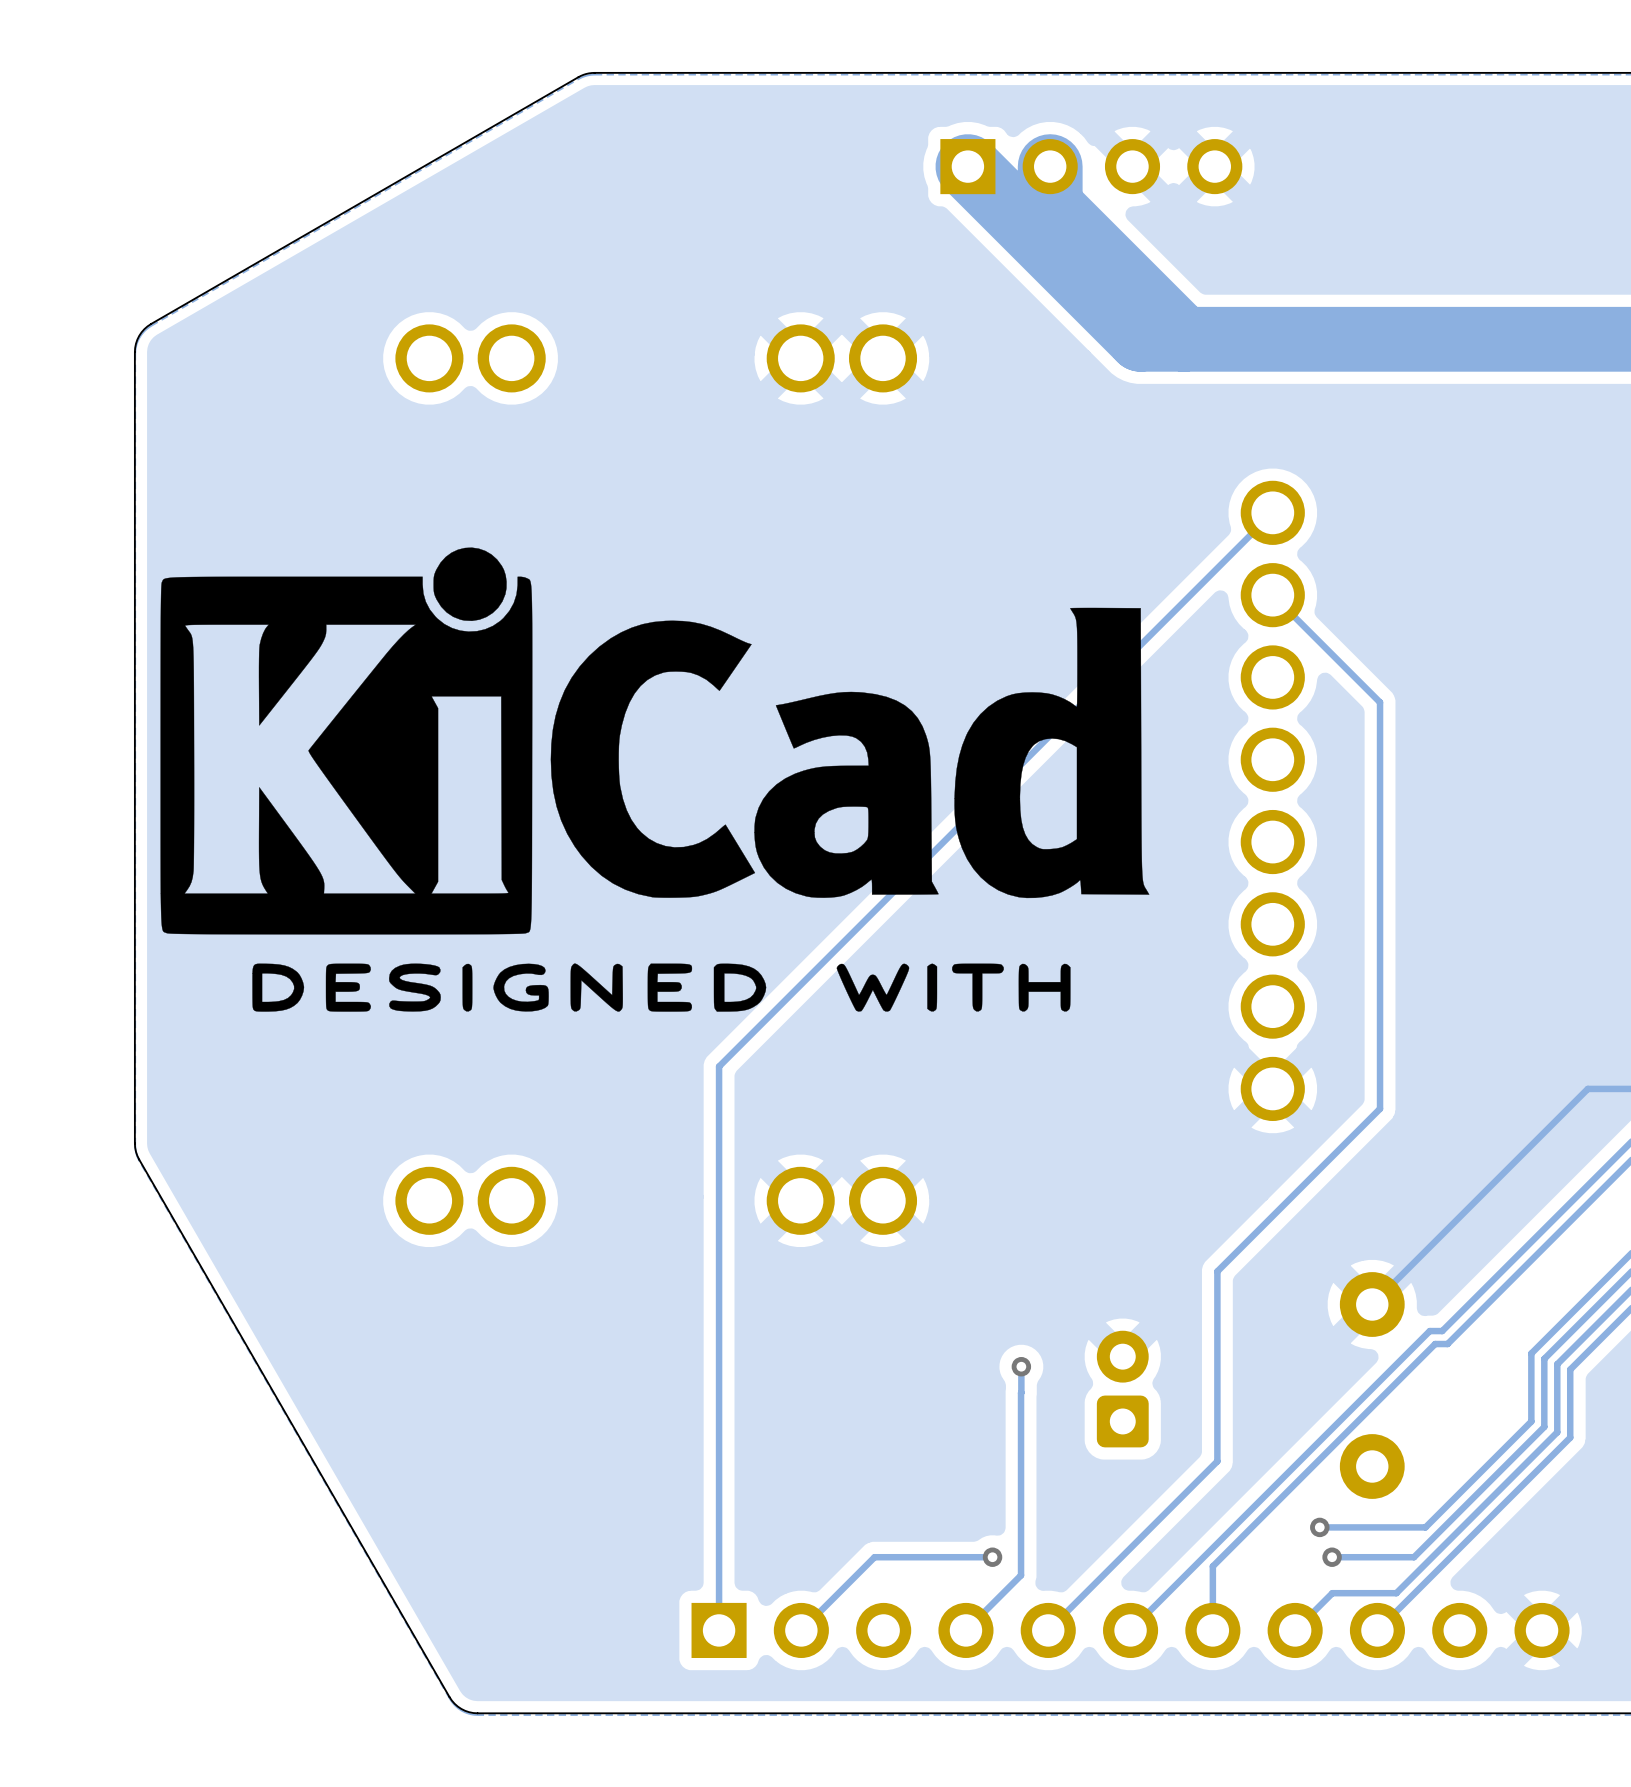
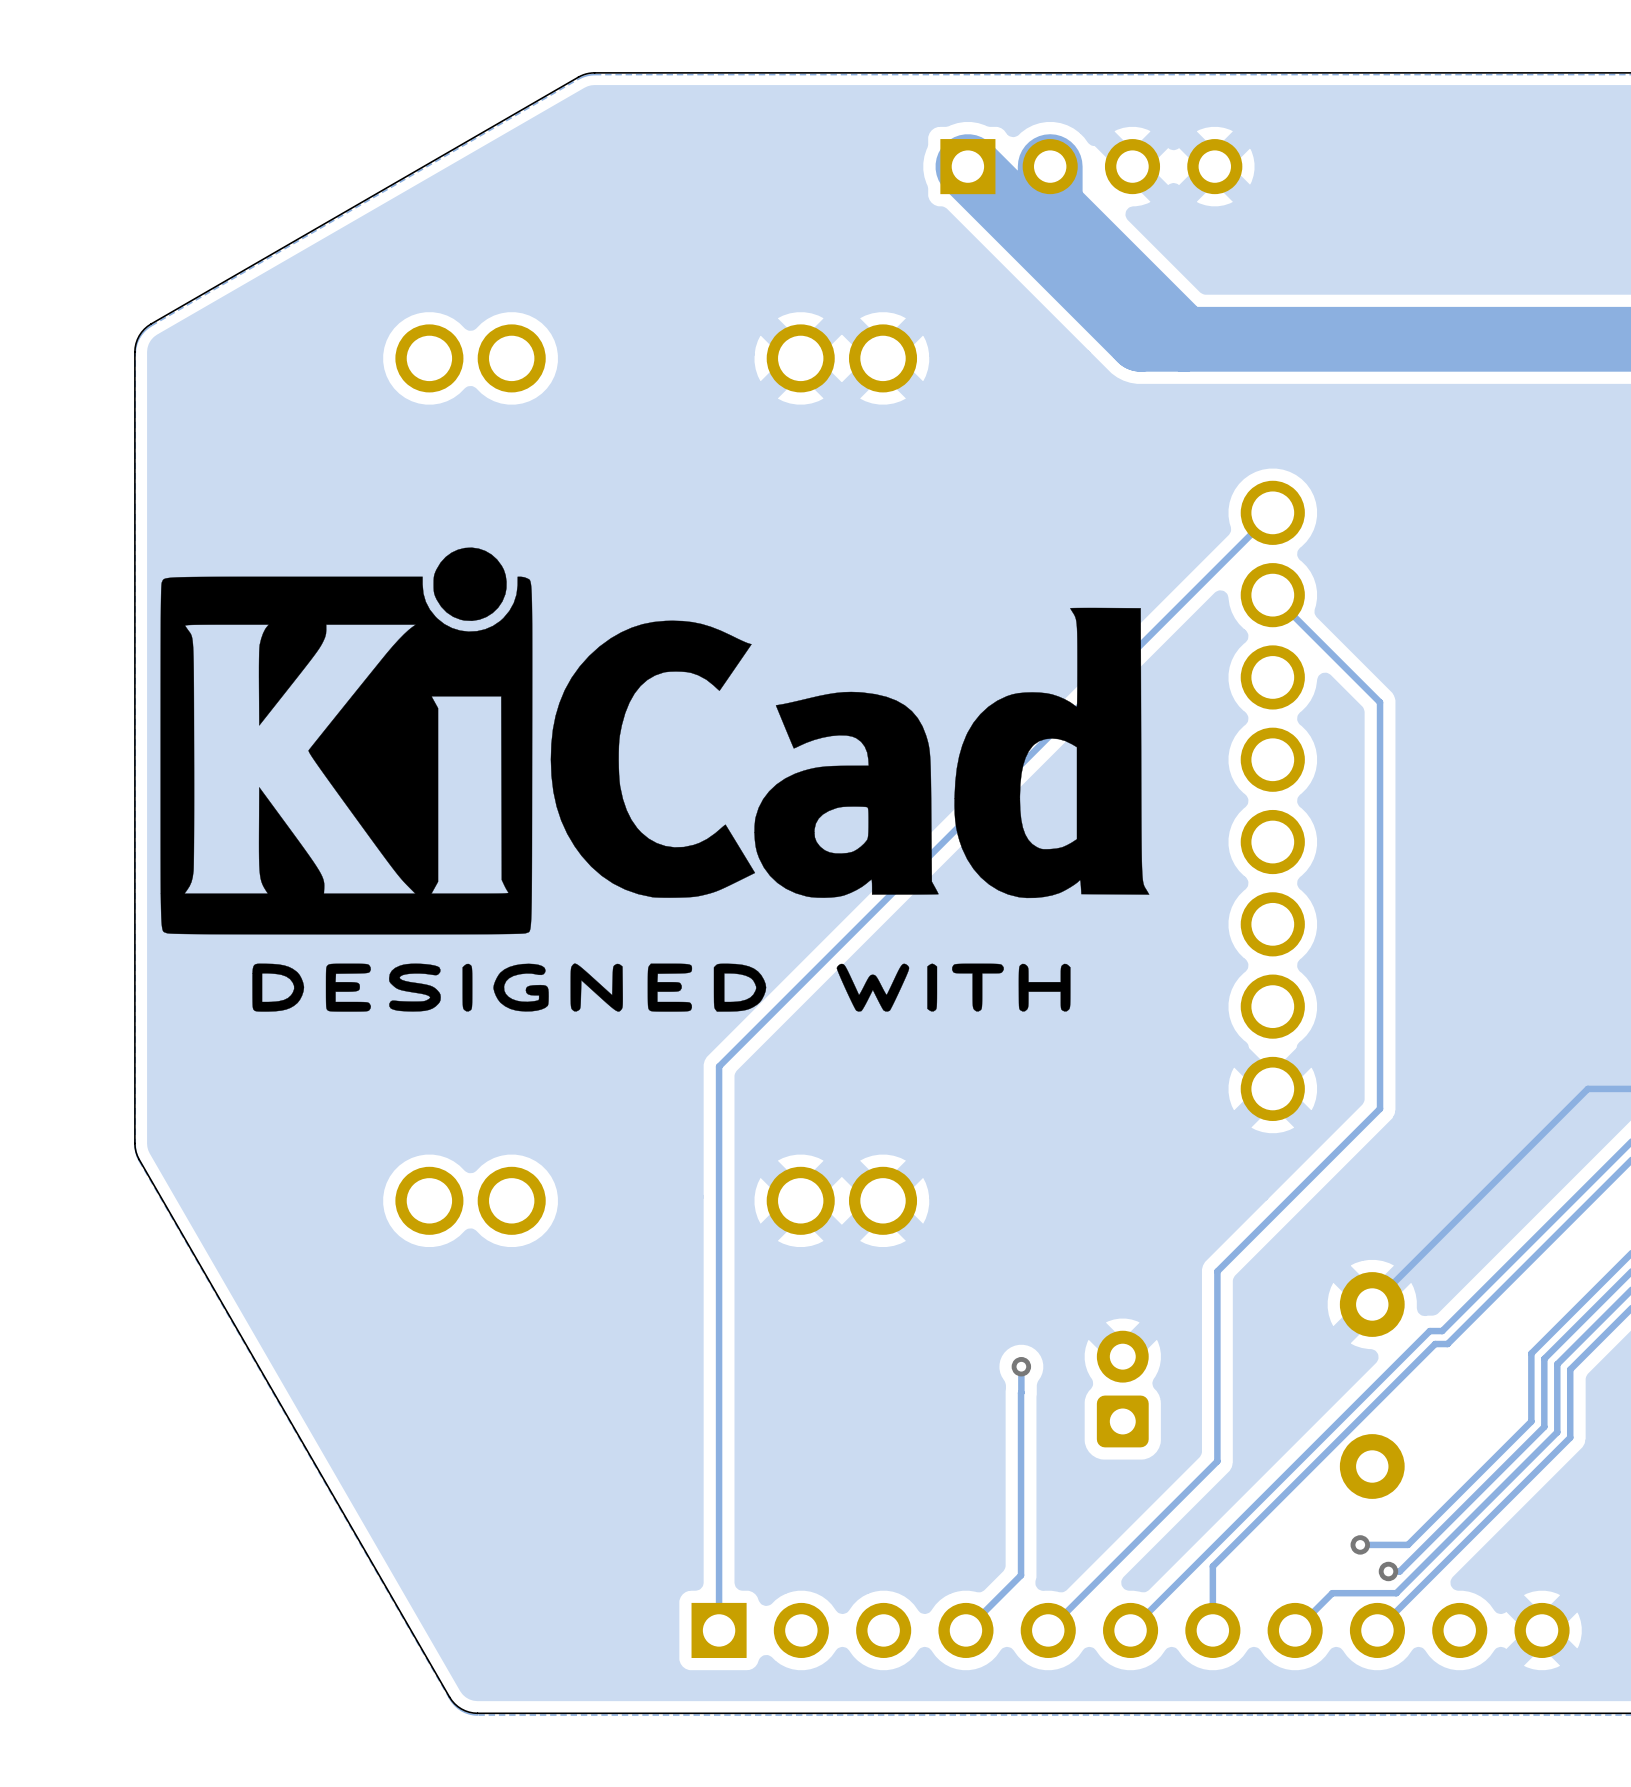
via: (1319, 1527) -> none
track: (1425, 1527) (1320, 1528) -> (1425, 1527) (1408, 1544) (1360, 1544)
via: none -> (1360, 1544)
track: (992, 1557) (874, 1557) (801, 1630) -> none
via: (992, 1557) -> none
via: (1332, 1557) -> none
track: (1414, 1557) (1332, 1557) -> (1414, 1557) (1399, 1571) (1388, 1571)
via: none -> (1388, 1571)

